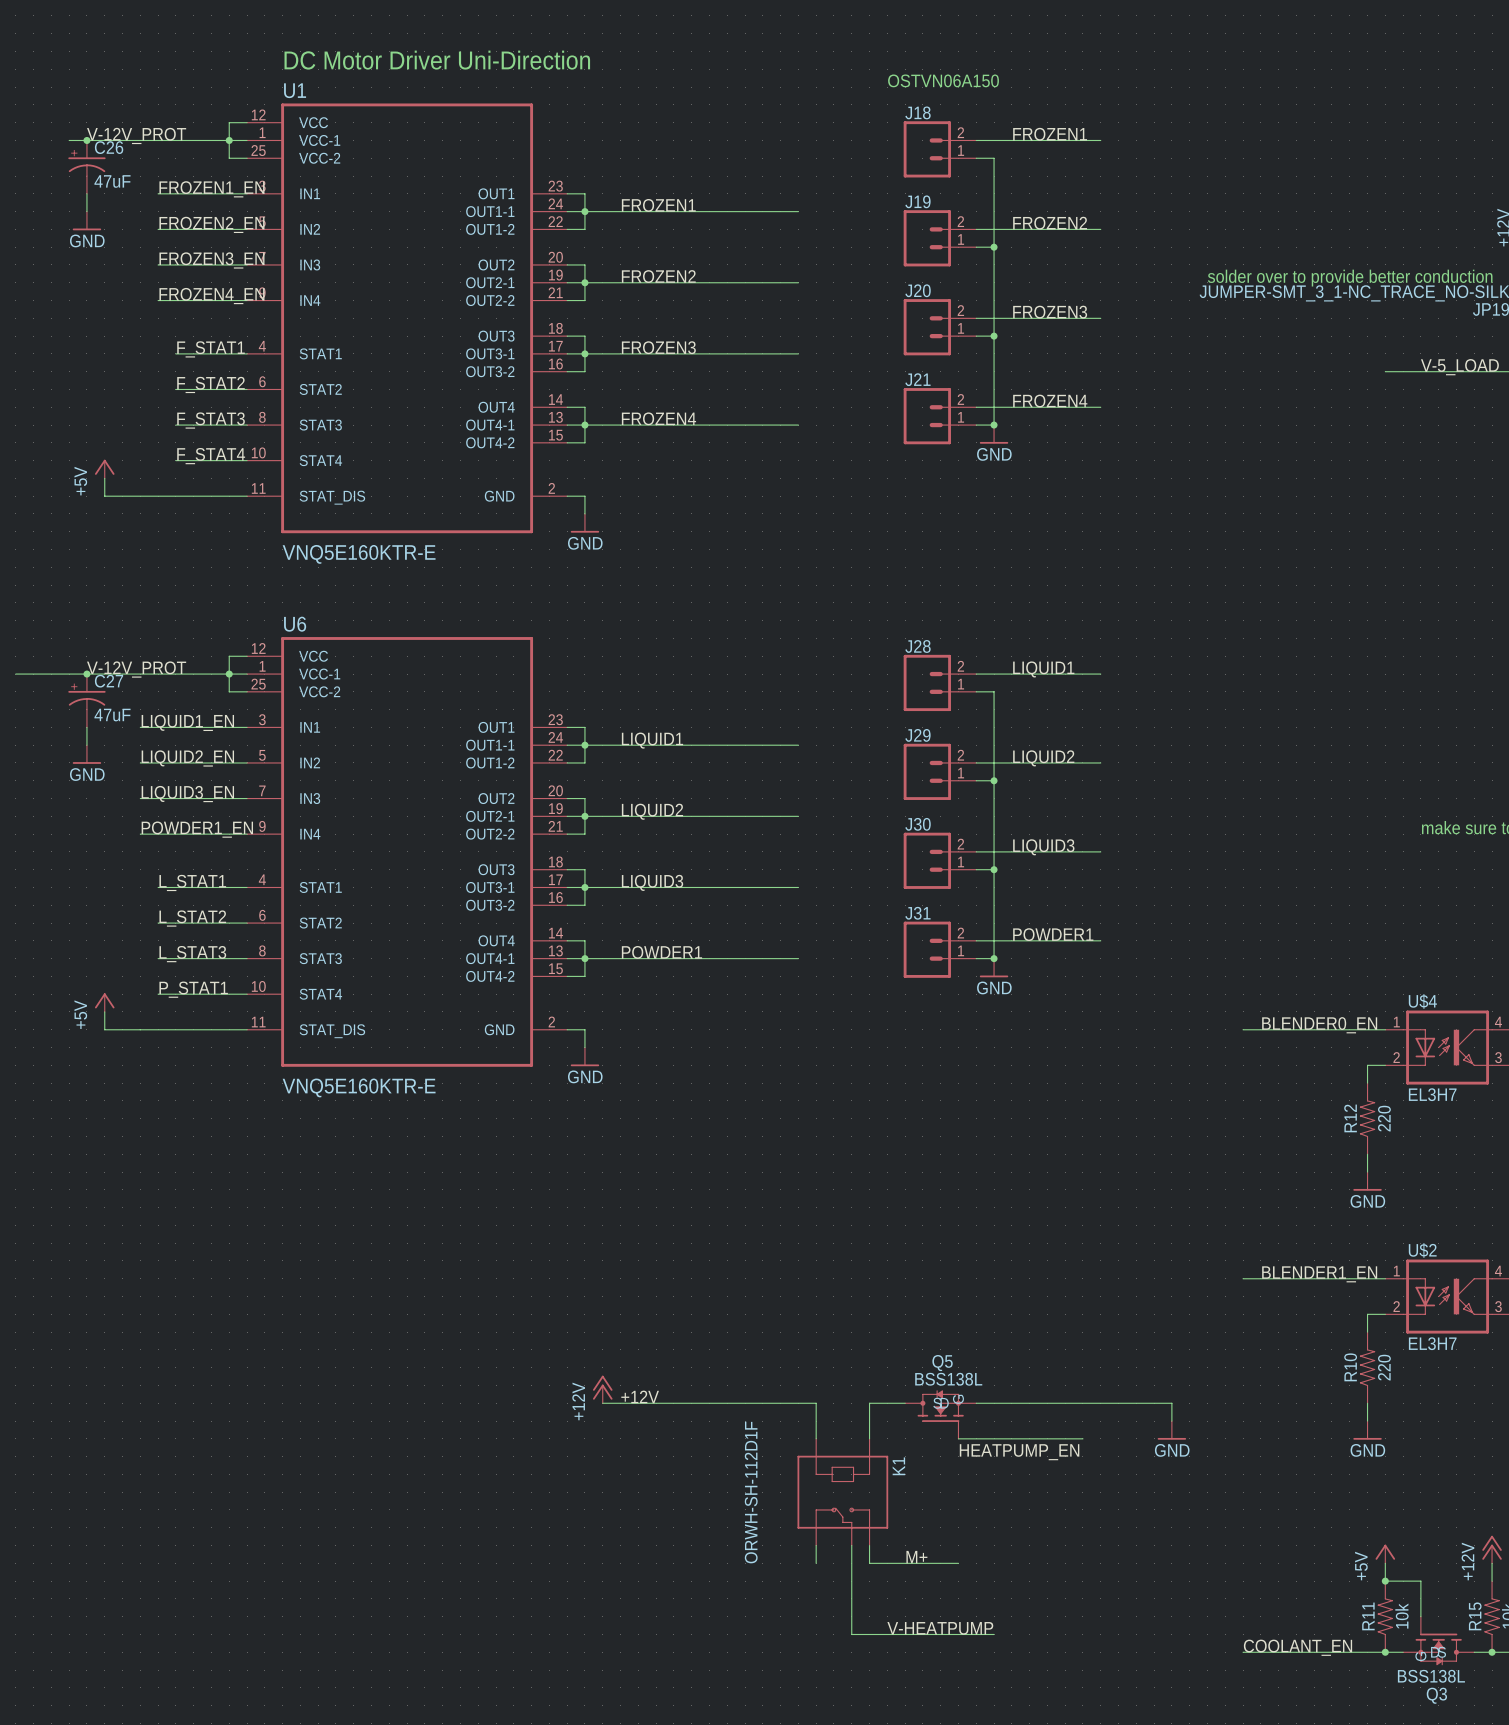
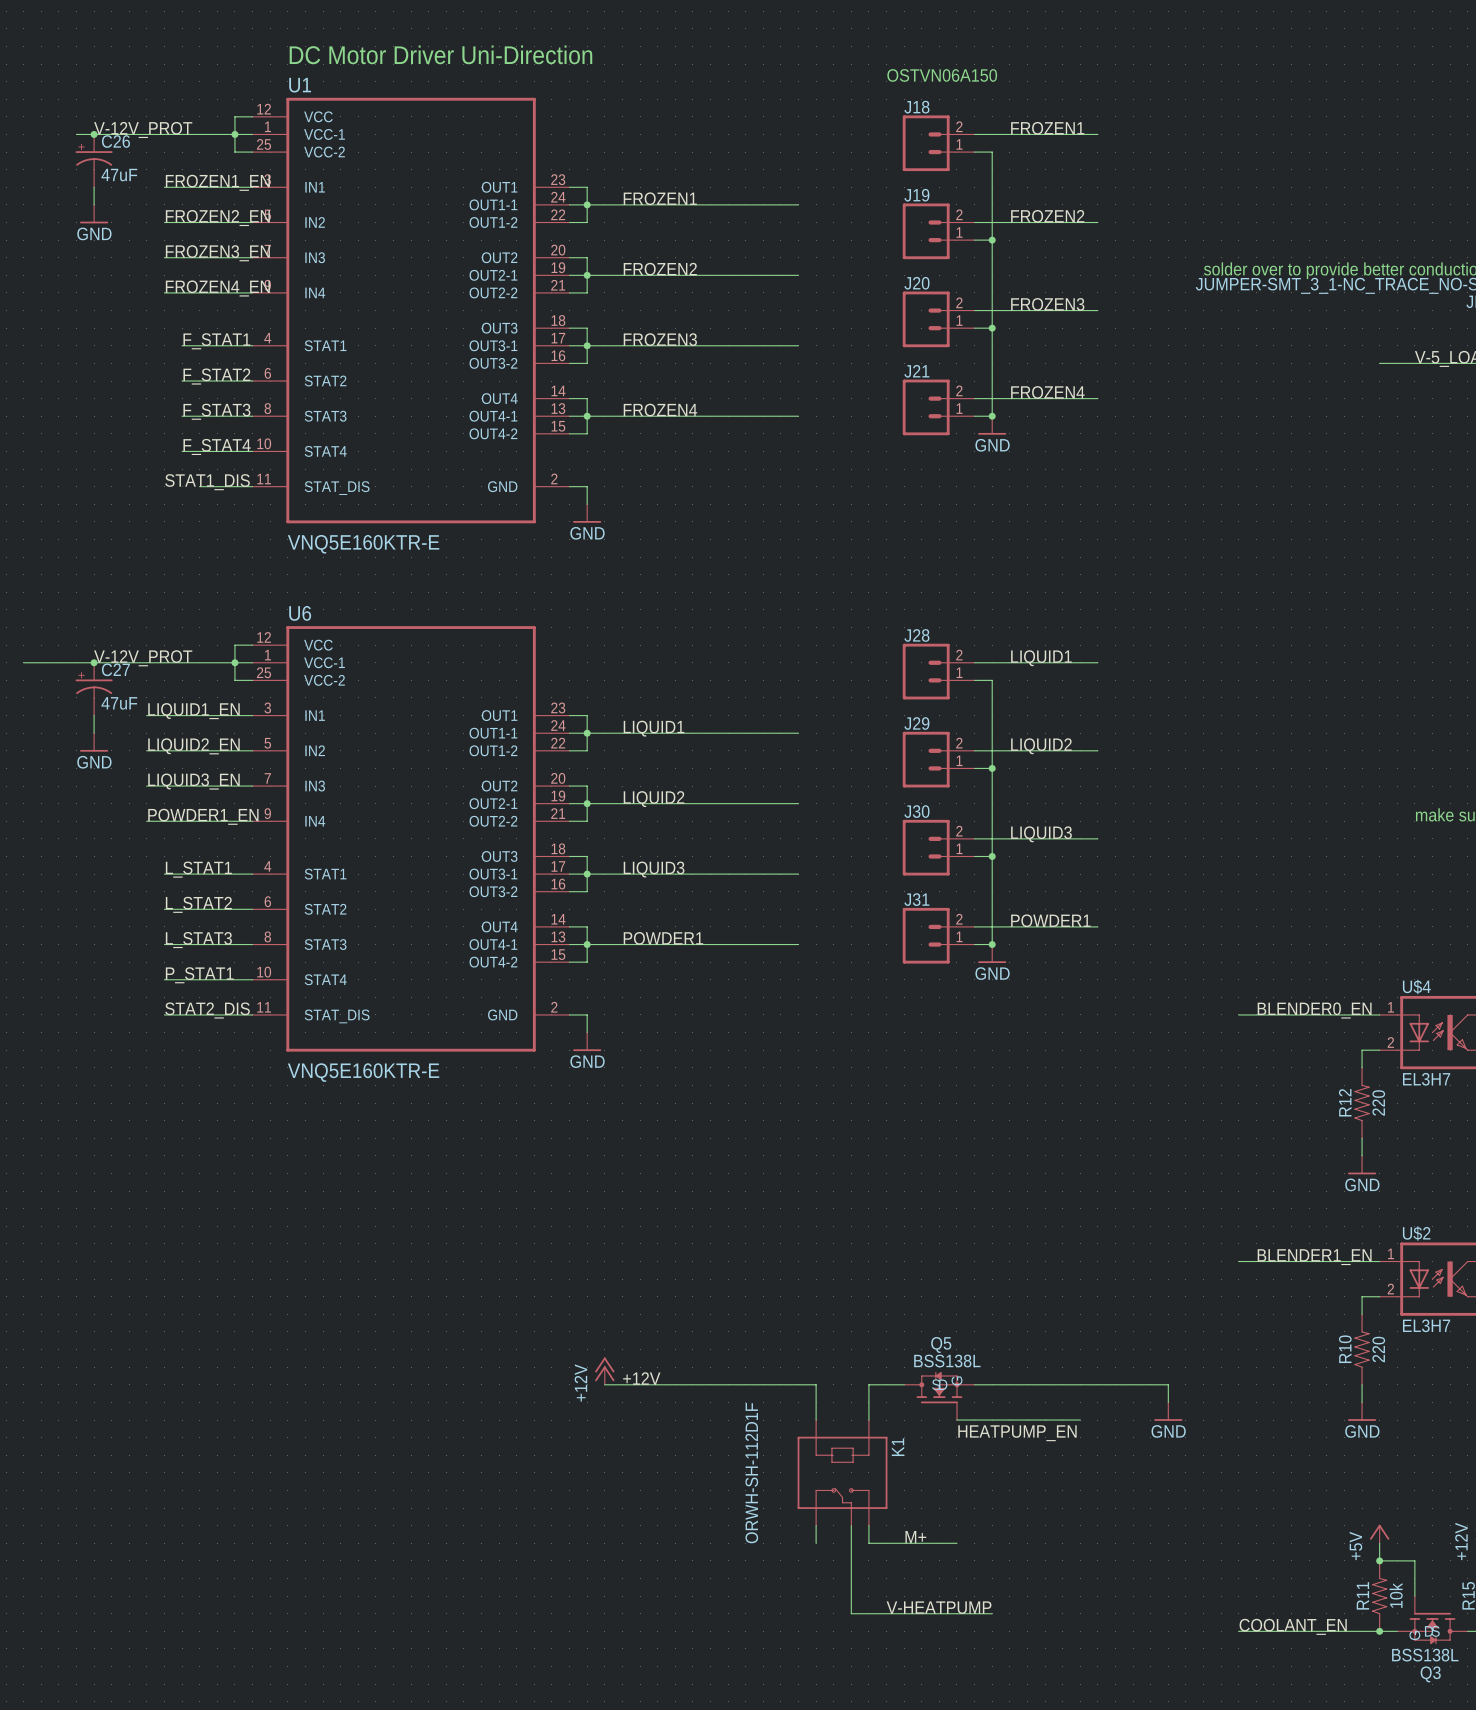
power symbol: +5V (104, 469) -> none
wire: (104, 478) (104, 496) (193, 496) -> none
label: none -> STAT1_DIS (207, 482)
power symbol: +5V (104, 1002) -> none
wire: (104, 1011) (104, 1029) (158, 1029) -> none
label: none -> STAT2_DIS (207, 1010)

